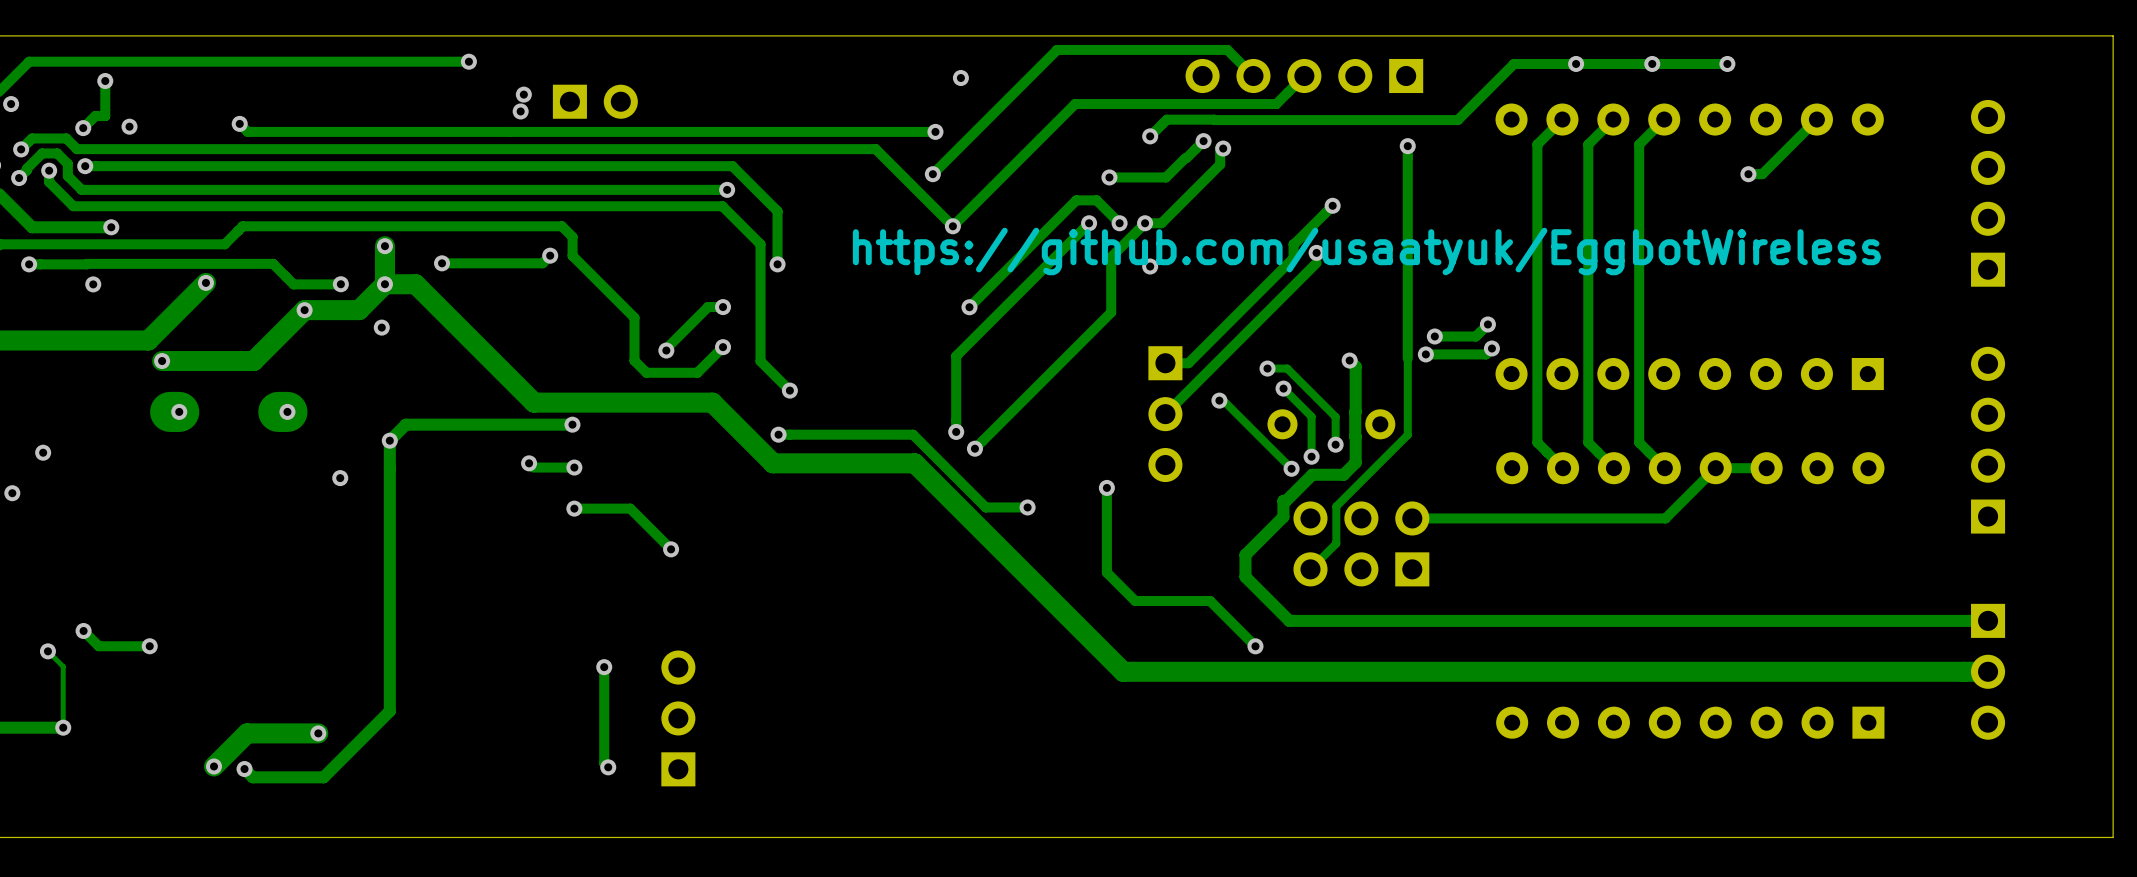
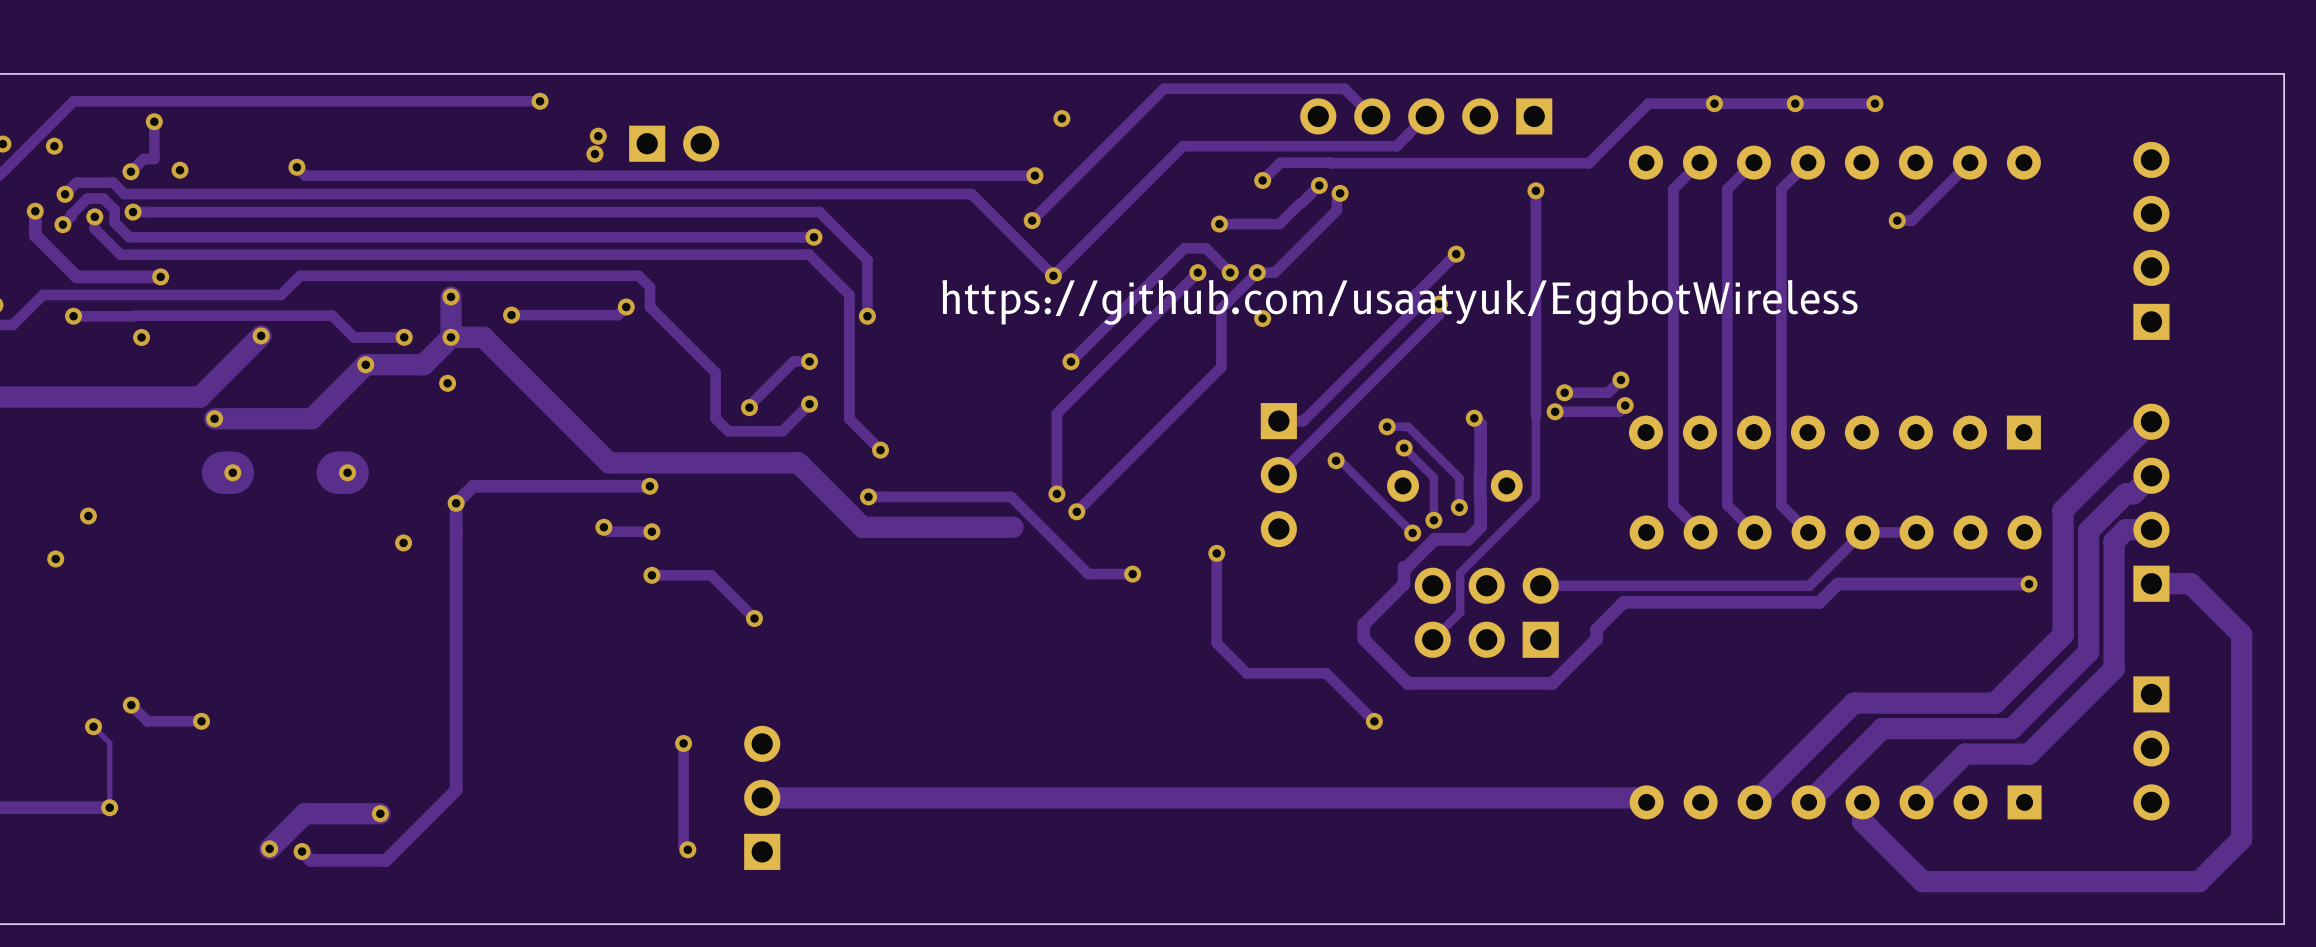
track: none -> (2151, 421) (2063, 510) (2063, 635) (1995, 703) (1853, 703) (1754, 802)
track: none -> (2151, 475) (2133, 493) (2125, 493) (2088, 530) (2088, 652) (2012, 728) (1882, 728) (1808, 802)
track: (914, 463) (1123, 671) (1988, 671) -> none
track: none -> (2151, 529) (2125, 529) (2114, 541) (2114, 669) (2029, 754) (1964, 754) (1916, 802)
via: none -> (2029, 584)
track: none -> (2151, 583) (2190, 583) (2241, 634) (2241, 839) (2199, 881) (1922, 881) (1862, 821) (1862, 802)
track: (1245, 568) (1245, 576) (1289, 620) (1988, 620) -> (1363, 639) (1407, 683) (1552, 683) (1596, 639) (1596, 629) (1623, 602) (1819, 602) (1837, 584) (2029, 584)
track: none -> (762, 797) (1642, 797) (1646, 802)

